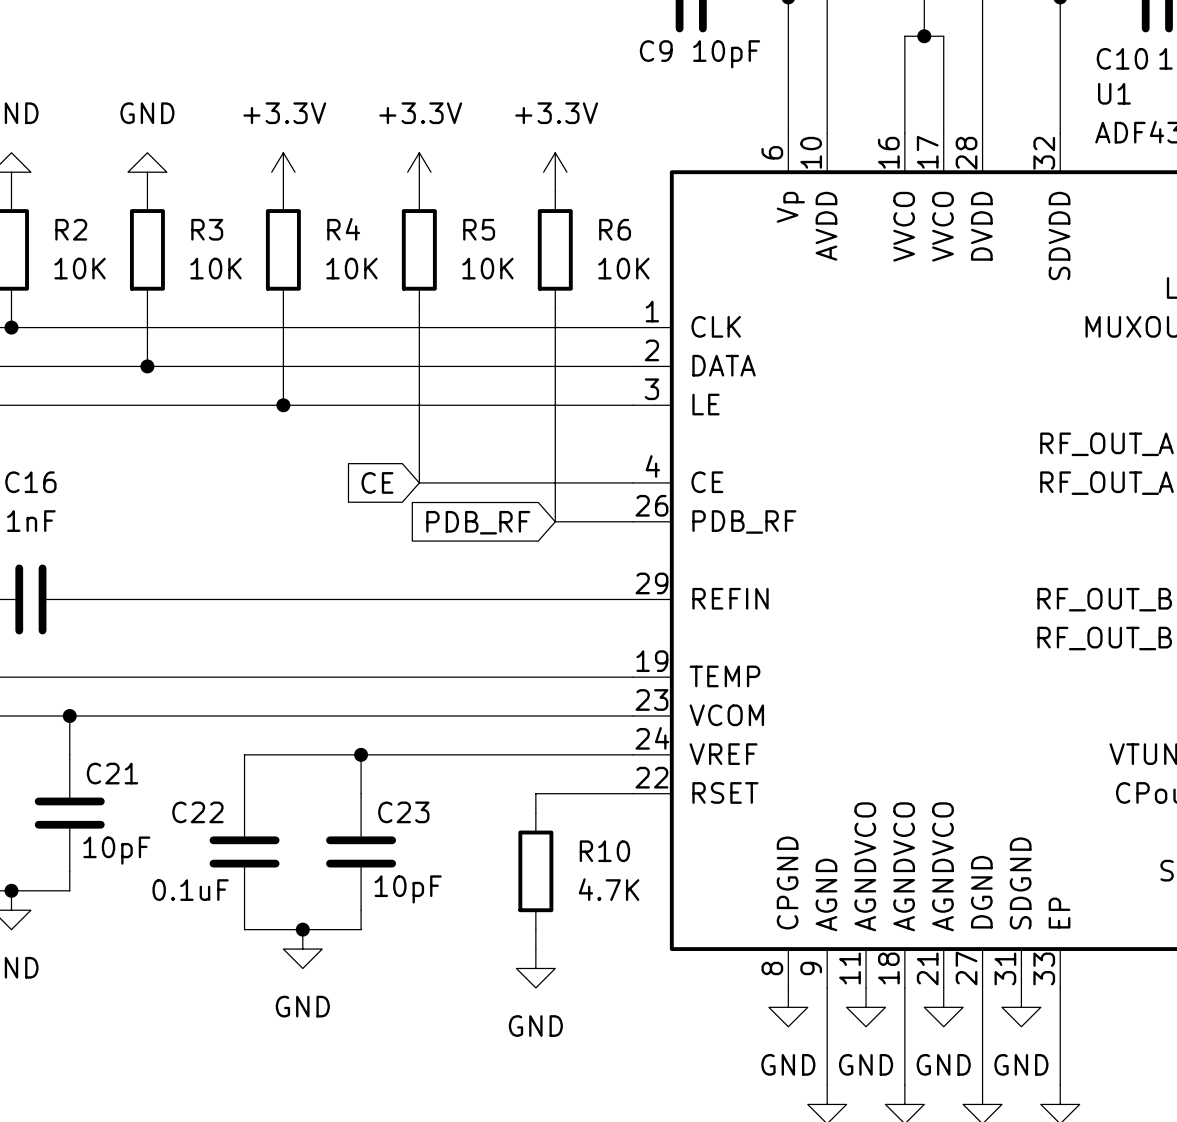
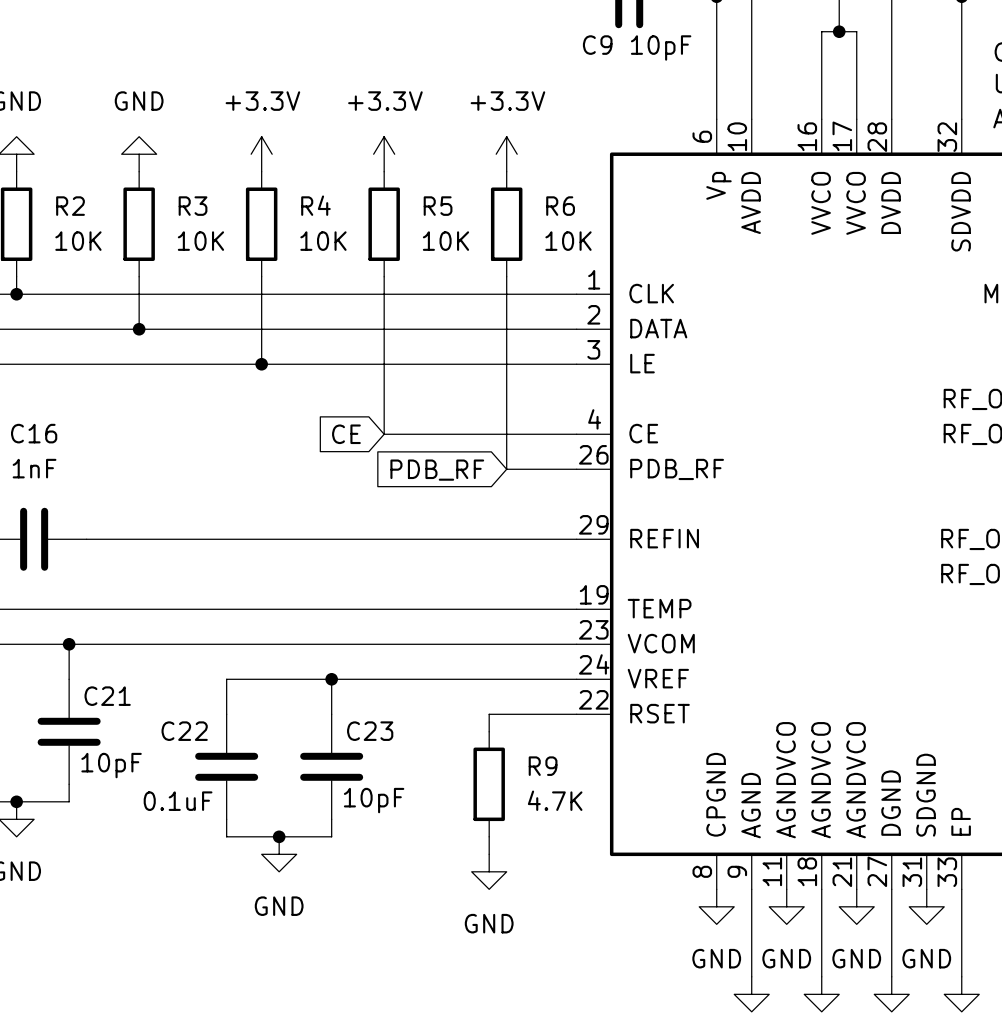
R10 name: R10 (604, 851) -> R9 (543, 766)

